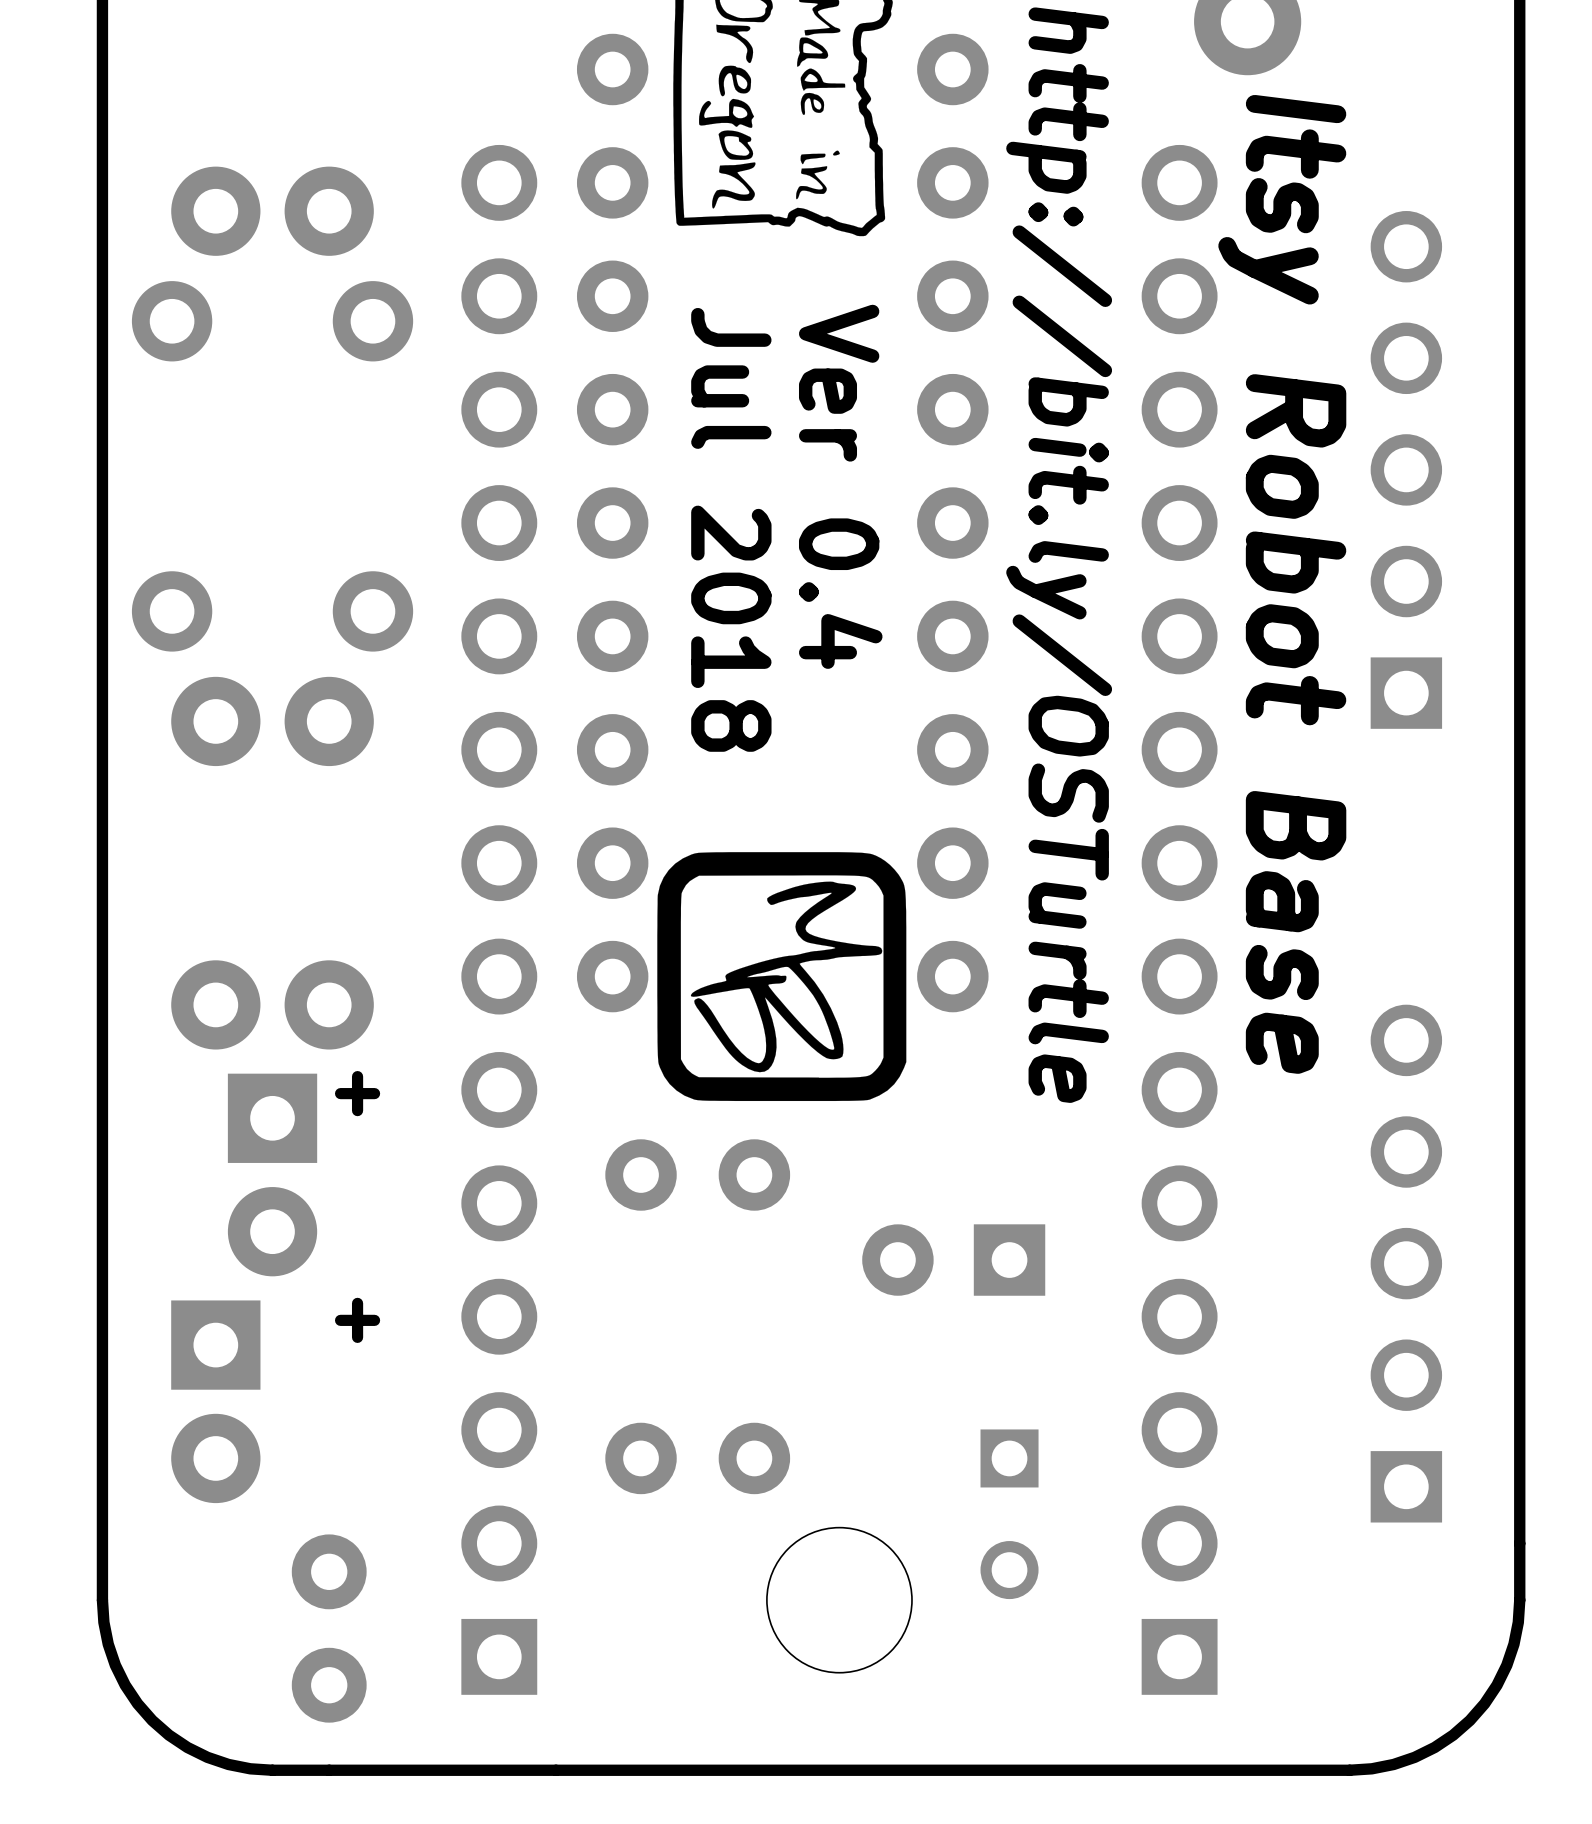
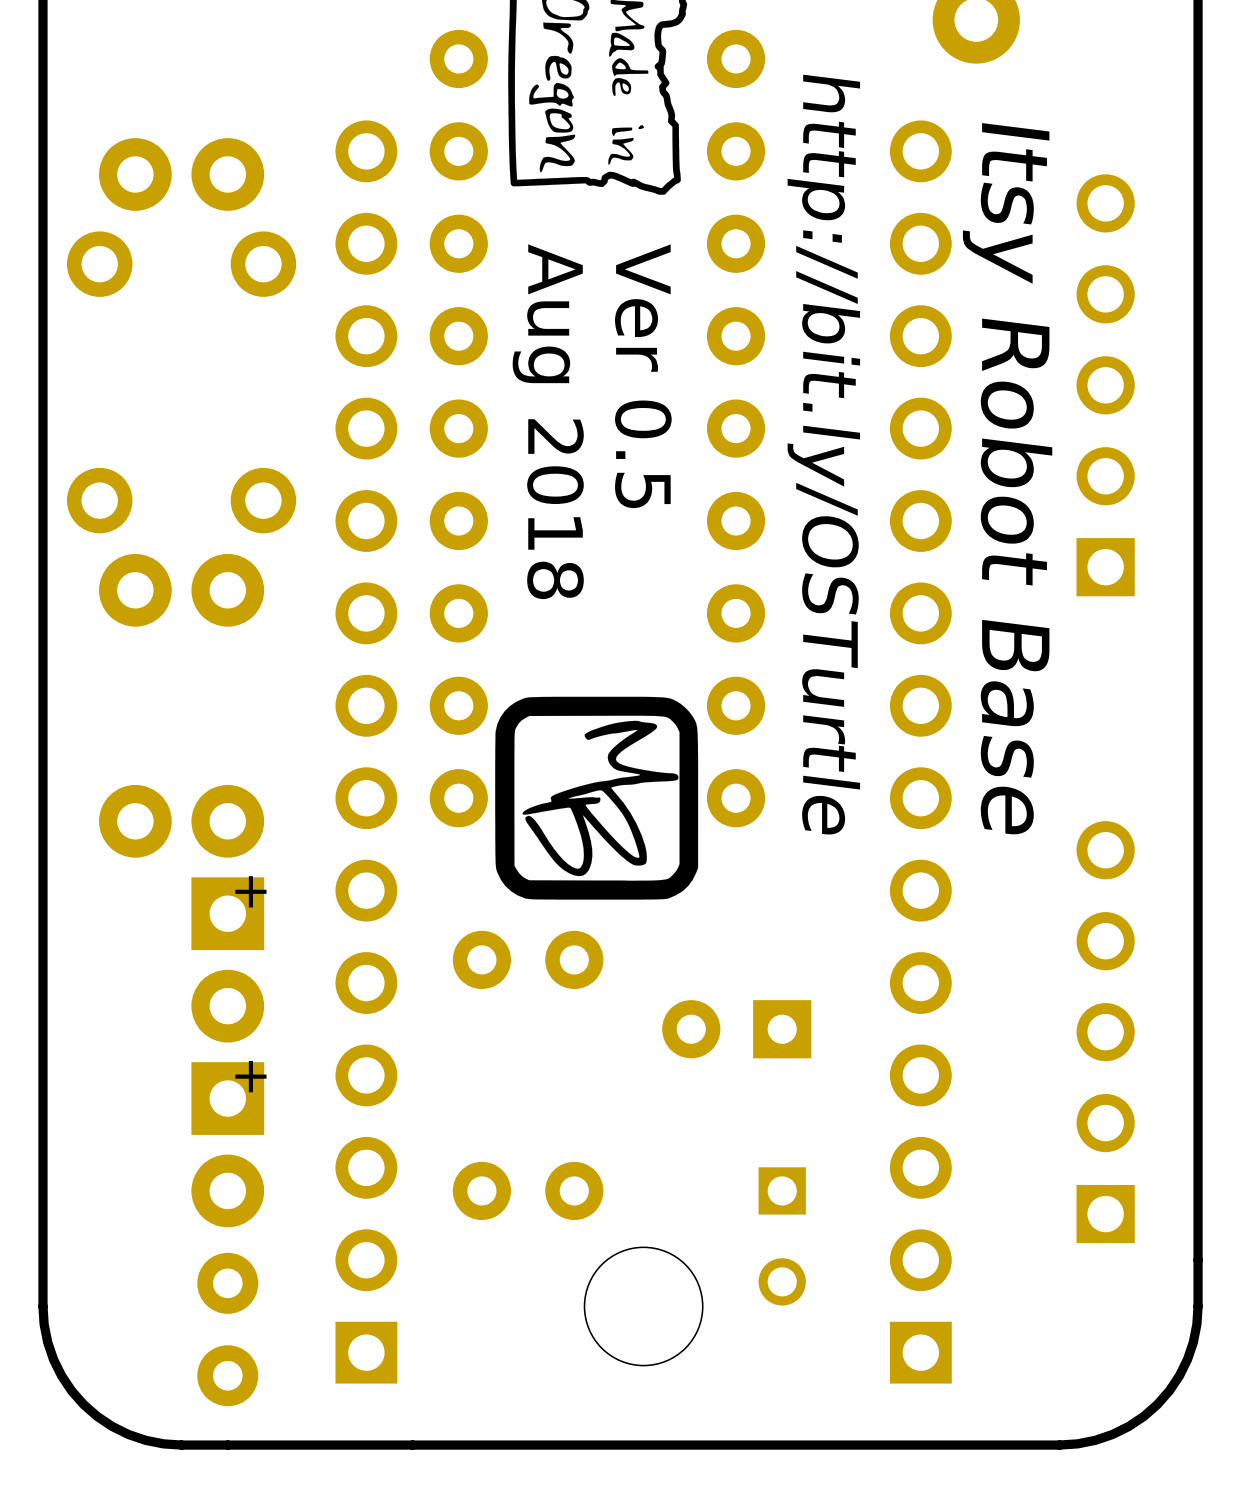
text: Ver 0.4 (840, 486) -> Ver 0.5 (643, 376)
text: Jul 2018 (731, 529) -> Aug 2018 (548, 421)
part position: (272, 1175) -> (227, 959)
part position: (215, 1401) -> (227, 1144)

